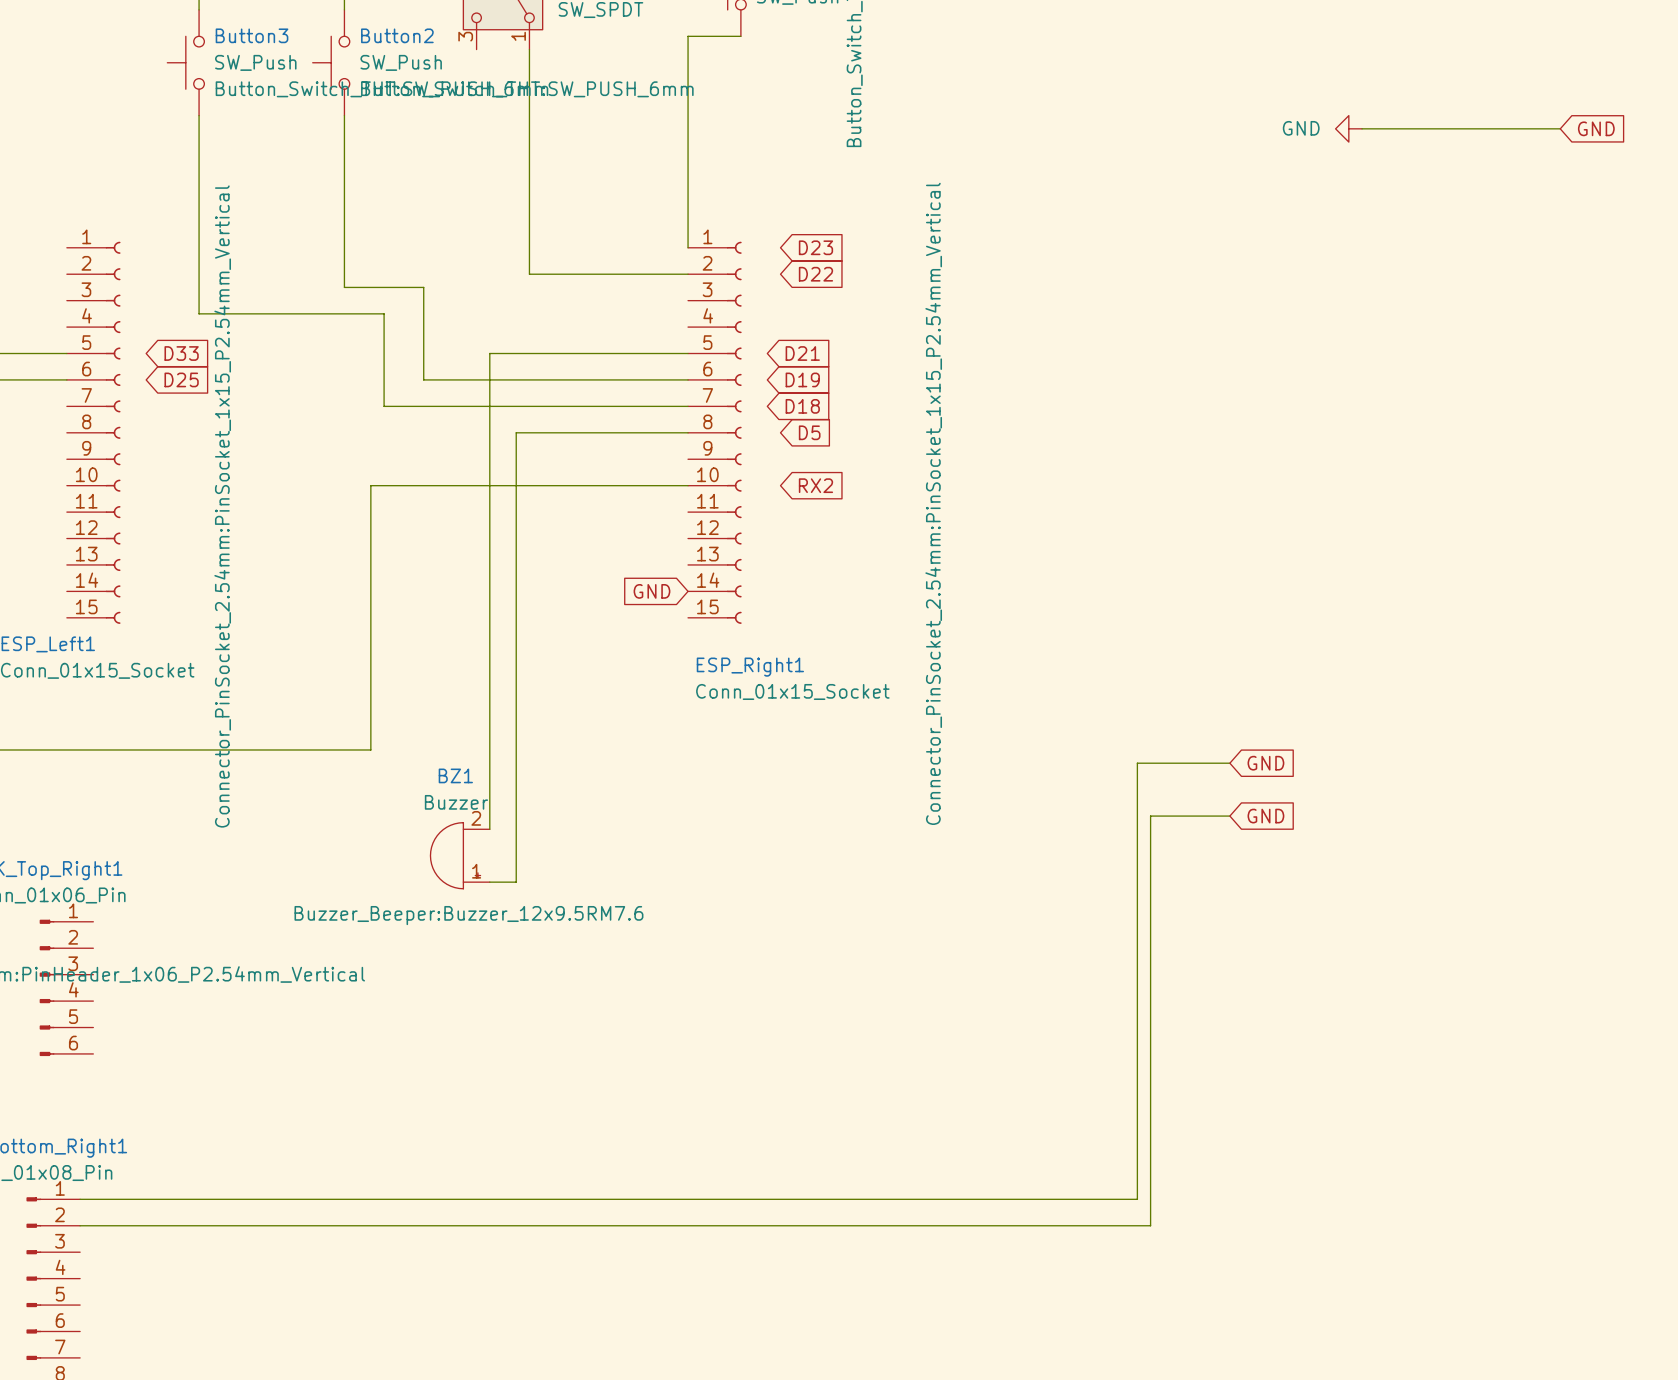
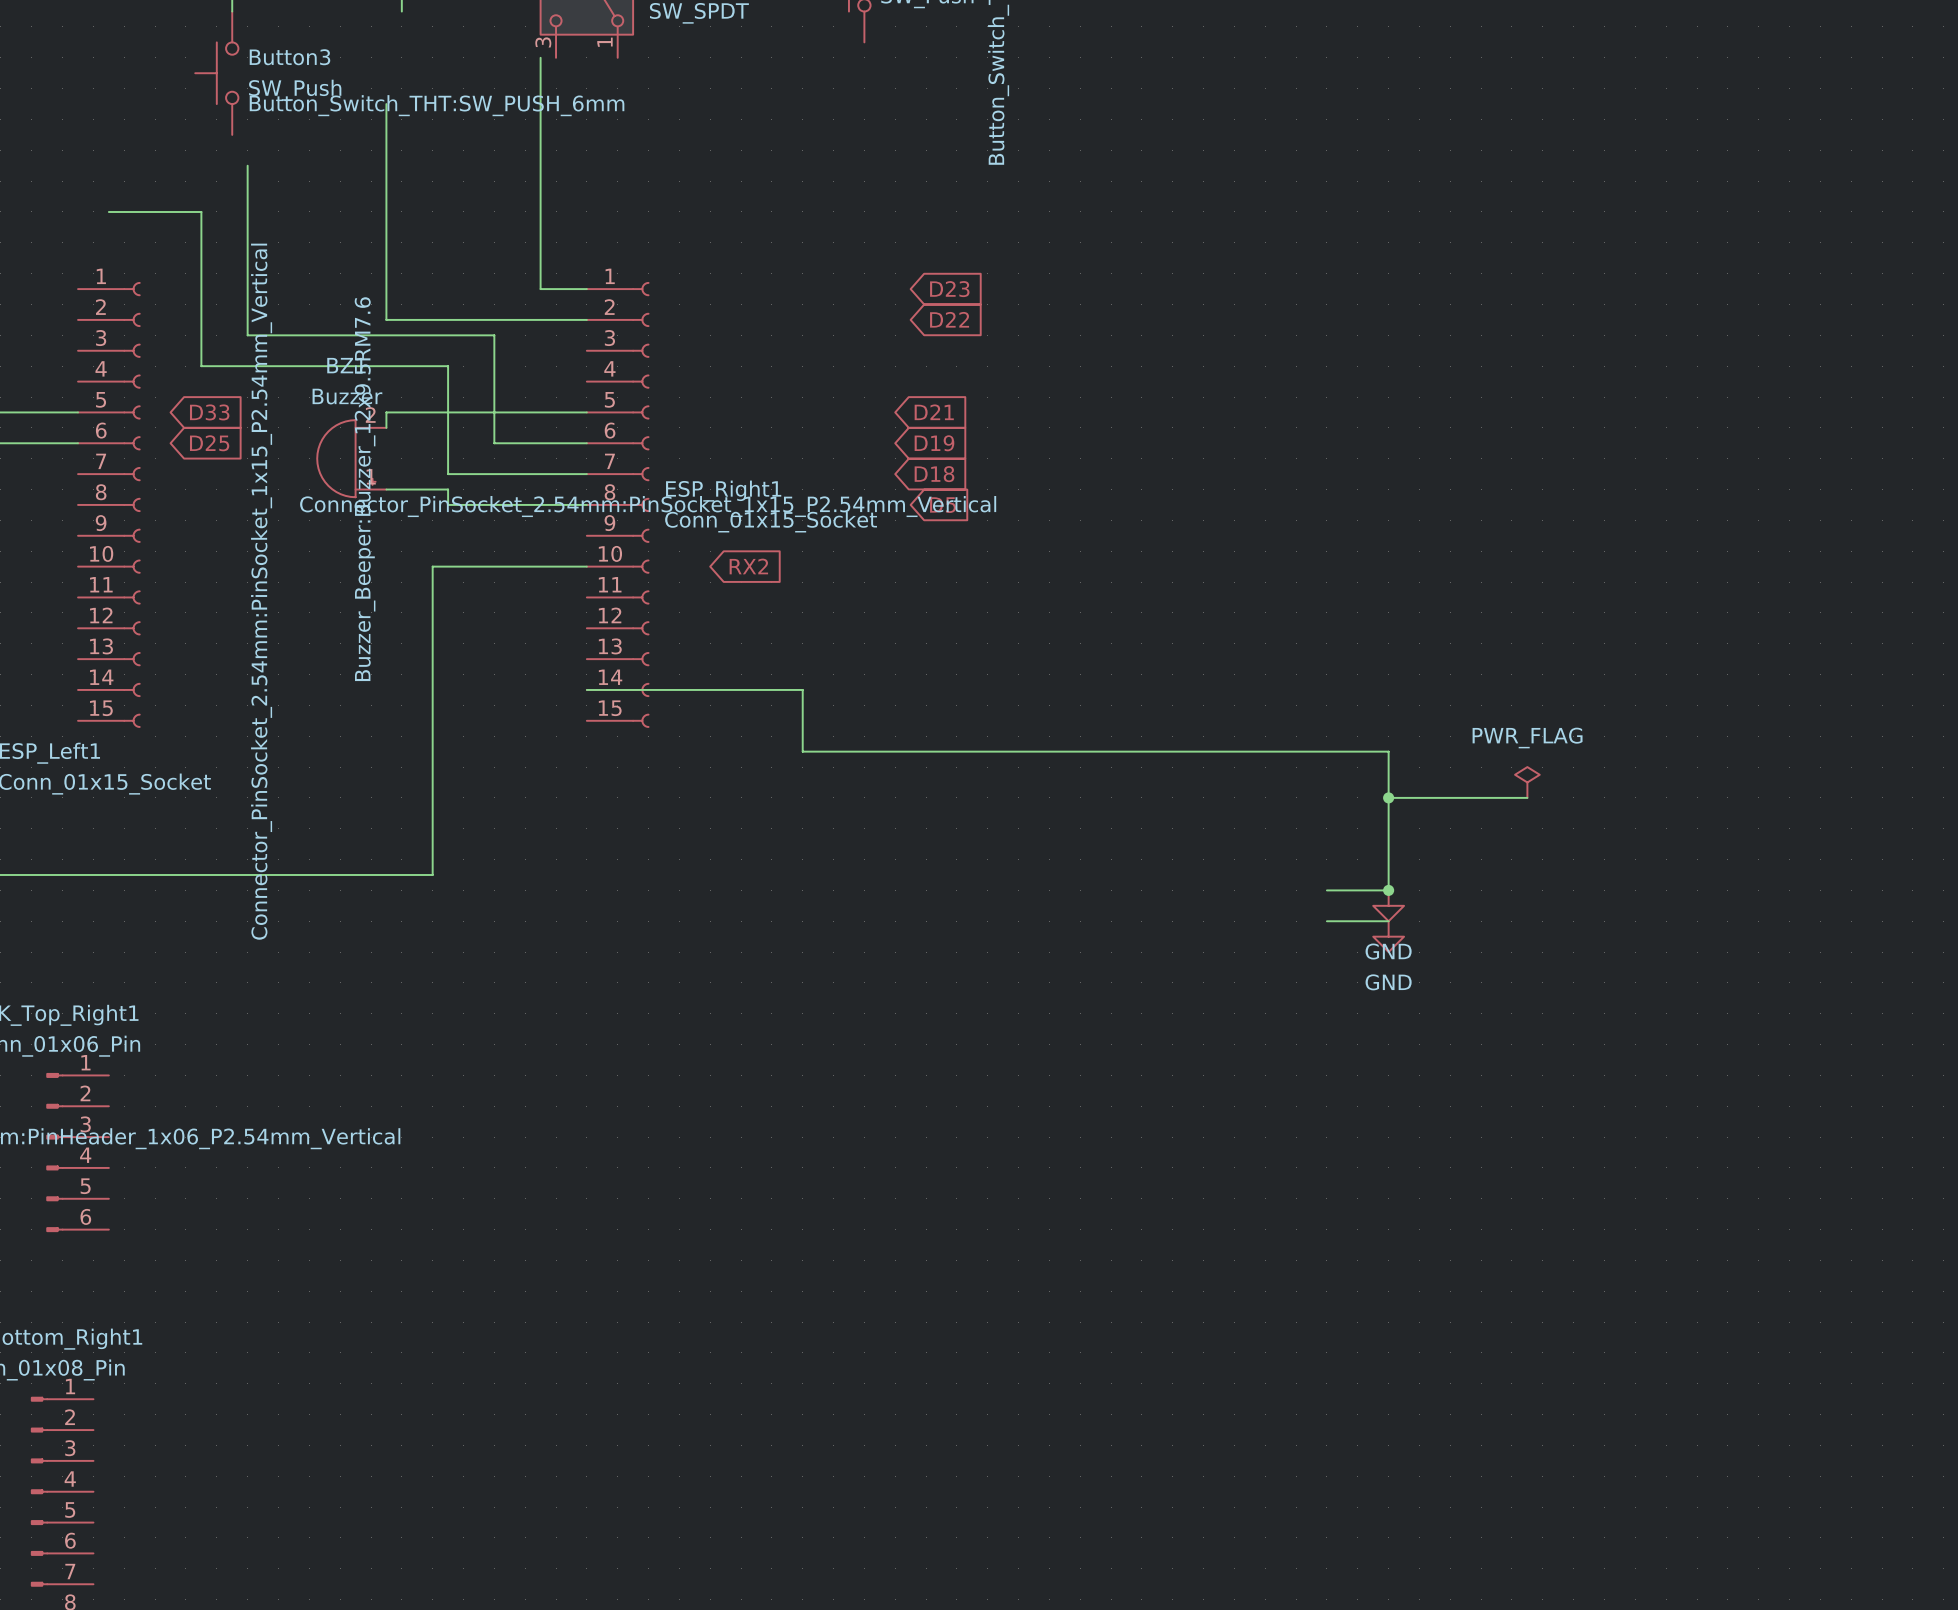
Button3 name position: Button3 (252, 35) -> Button3 (289, 57)
wire: (740, 36) (688, 36) (688, 247) -> none
wire: none -> (540, 57) (540, 289) (586, 289)
wire: (529, 49) (529, 274) (688, 274) -> none
Button3 value position: SW_Push (255, 62) -> SW_Push (295, 90)
Button2: SW_Push (331, 62) -> none
wire: none -> (386, 104) (386, 319) (586, 319)
wire: (199, 115) (199, 313) -> (108, 211) (201, 211) (201, 366) (232, 366)
wire: (344, 115) (344, 287) -> (247, 165) (247, 335) (401, 335)
power symbol: GND (1348, 128) -> none
wire: (1362, 128) (1560, 128) -> none
global label: GND (1596, 128) -> none
wire: (489, 353) (489, 829) -> (571, 412) (386, 412) (386, 427)
wire: (503, 353) (688, 353) -> none
wire: (503, 379) (688, 379) -> none
wire: (503, 406) (688, 406) -> none
wire: none -> (386, 489) (448, 489) (448, 504) (586, 504)
wire: (688, 432) (516, 432) (516, 882) (489, 882) -> none
ESP_Right1 position: (714, 432) -> (618, 504)
wire: (503, 485) (688, 485) -> none
global label position: RX2 (815, 485) -> RX2 (748, 566)
ESP_Right1 text rotation: 0° (933, 503) -> 90° clockwise (648, 506)
global label: GND (651, 591) -> none
ESP_Right1 name position: ESP_Right1 (750, 667) -> ESP_Right1 (723, 491)
power symbol: none -> PWR_FLAG (1527, 782)
wire: none -> (1388, 797) (1527, 797)
junction: none -> (1388, 797)
ESP_Right1 value position: Conn_01x15_Socket (792, 691) -> Conn_01x15_Socket (771, 521)
wire: (1137, 763) (1137, 1199) (80, 1199) -> none
wire: (1190, 763) (1229, 763) -> (1388, 890) (1388, 751) (802, 751) (802, 689) (586, 689)
junction: none -> (1388, 890)
global label: GND (1265, 763) -> none
power symbol: none -> GND (1388, 905)
wire: none -> (1326, 921) (1388, 921)
power symbol: none -> GND (1388, 936)
wire: (1229, 816) (1150, 816) (1150, 1225) (80, 1225) -> none
global label: GND (1265, 816) -> none
BZ1 position: (460, 855) -> (351, 458)
BZ1 text rotation: 0° (468, 915) -> 90° counterclockwise (365, 489)

